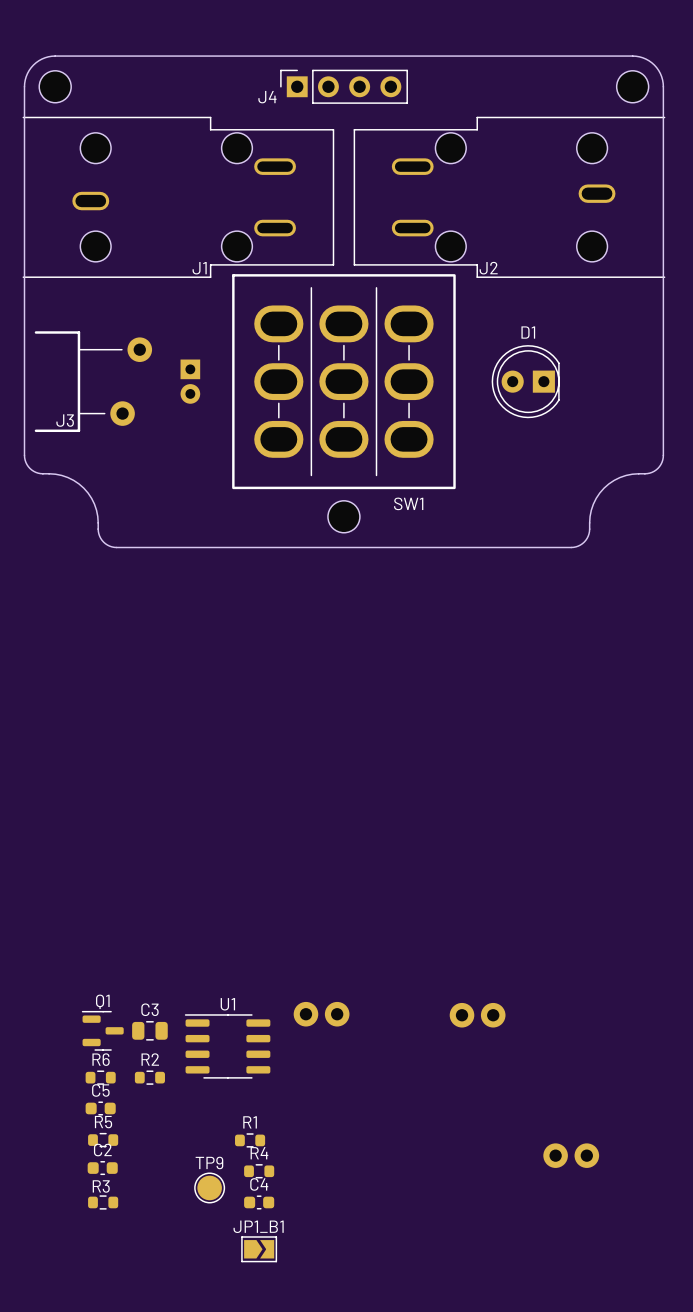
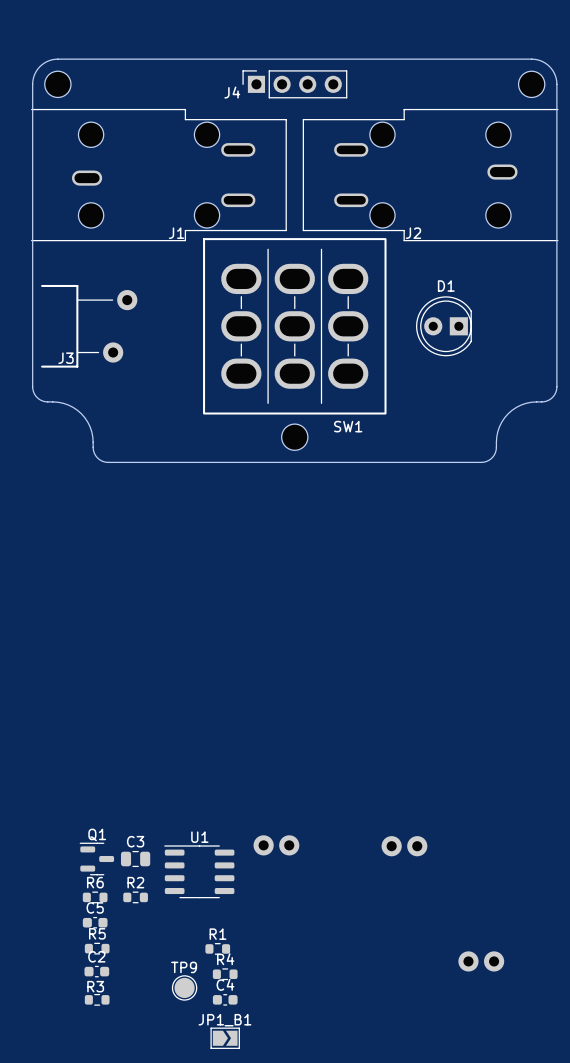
part: (190, 381) -> none

